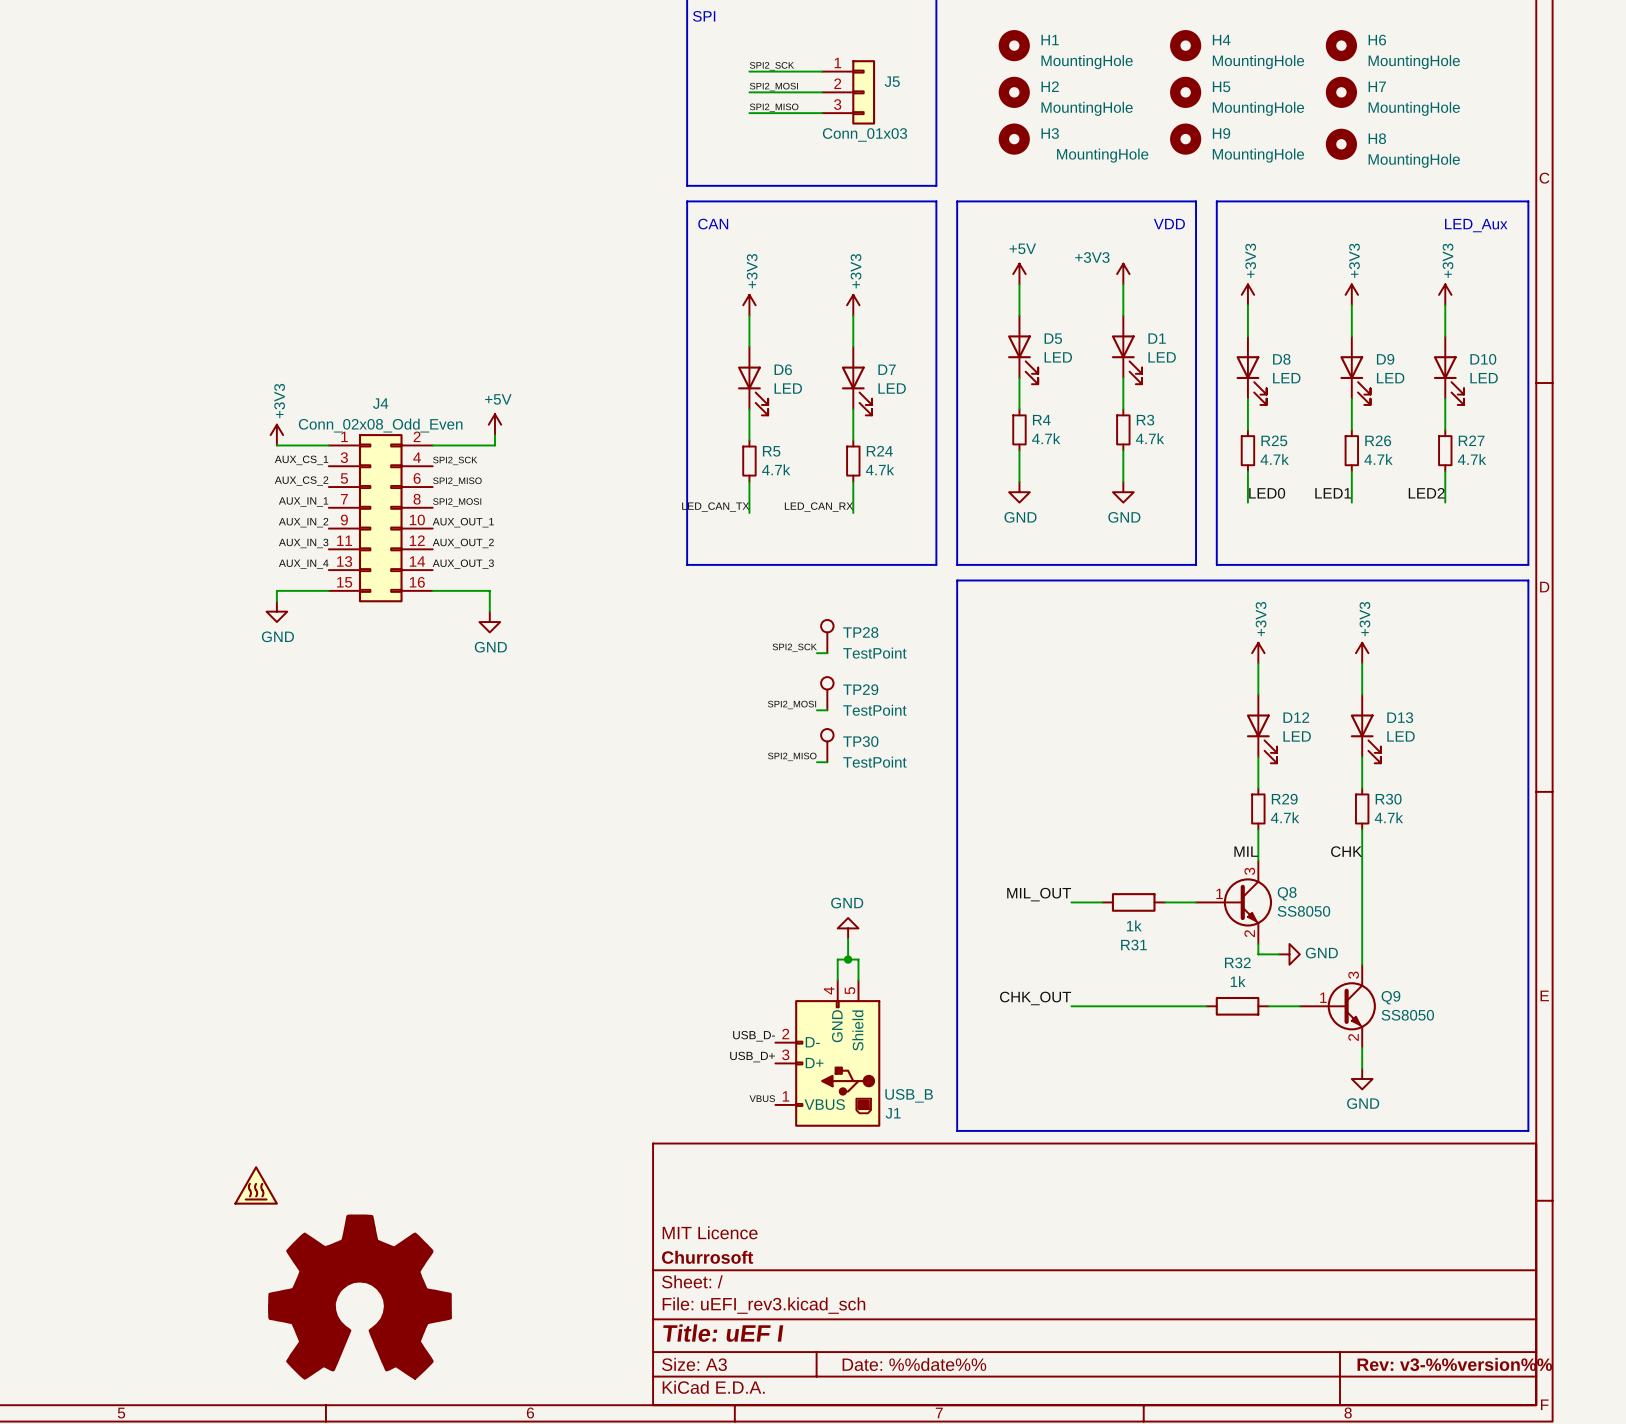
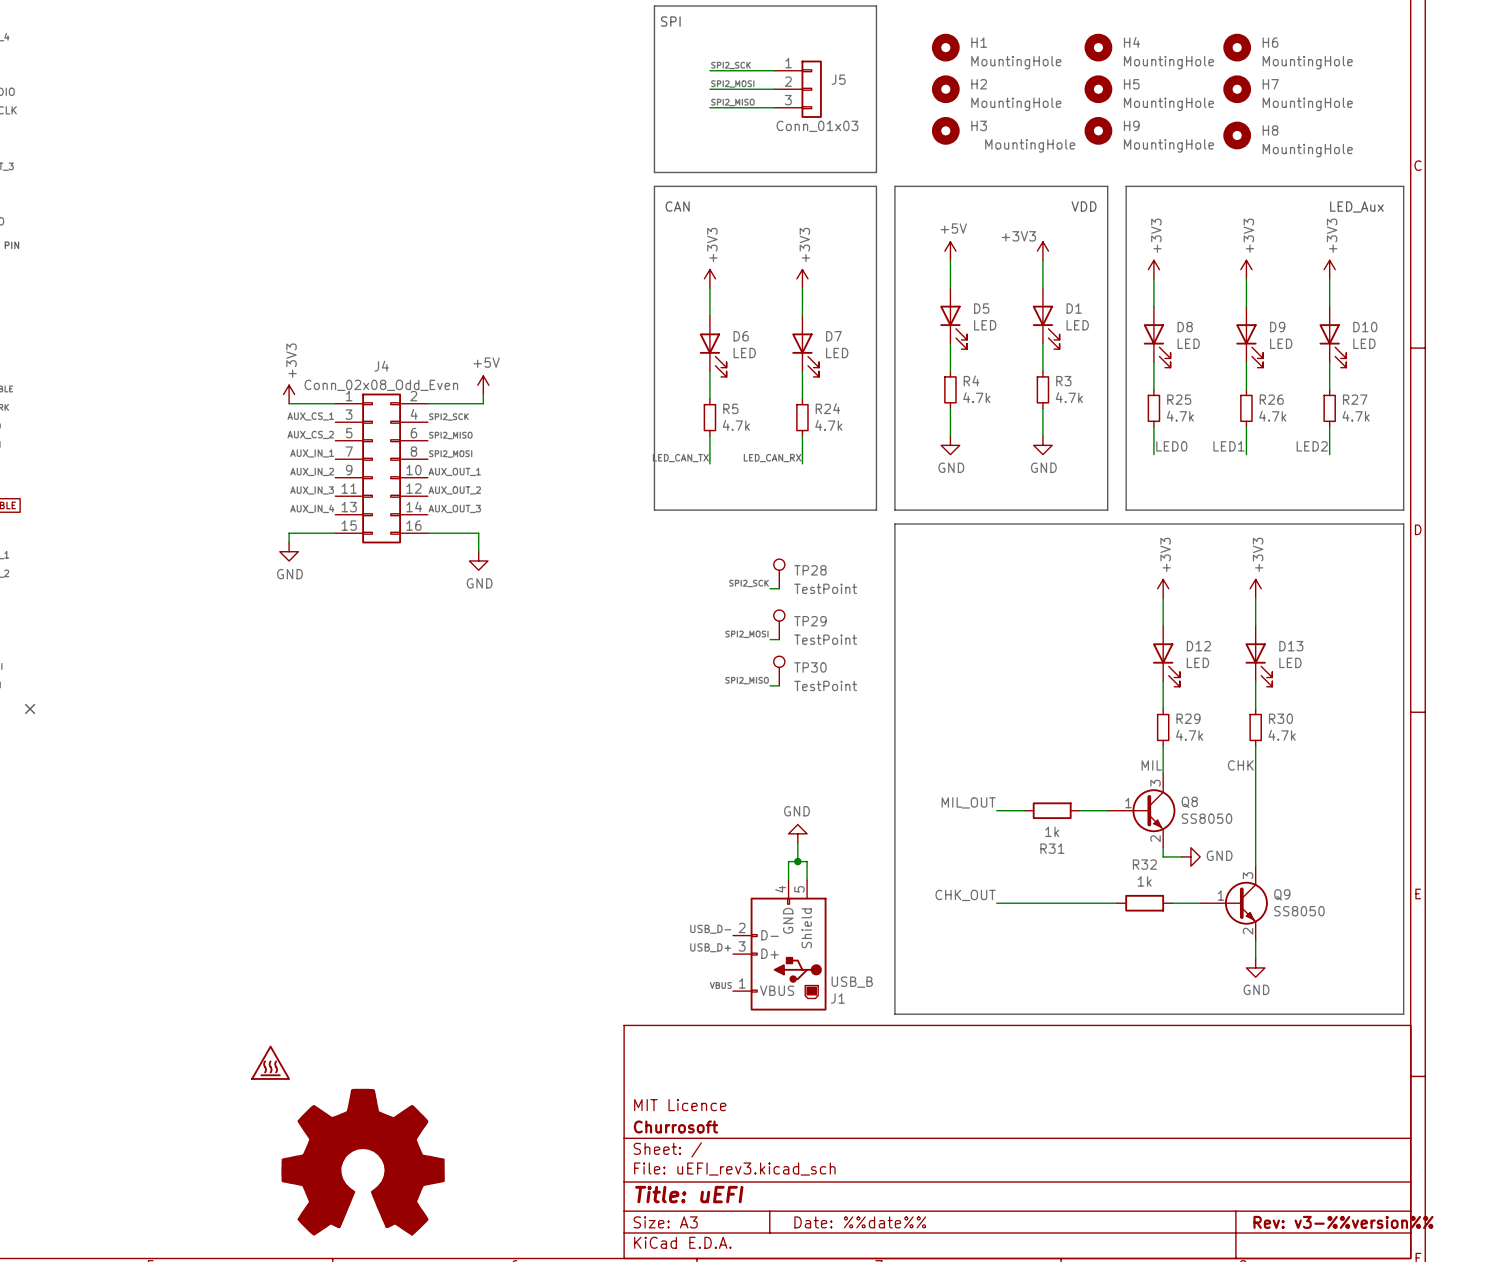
title block: Title: uEF I (723, 1333) -> Title: uEFI (689, 1194)

